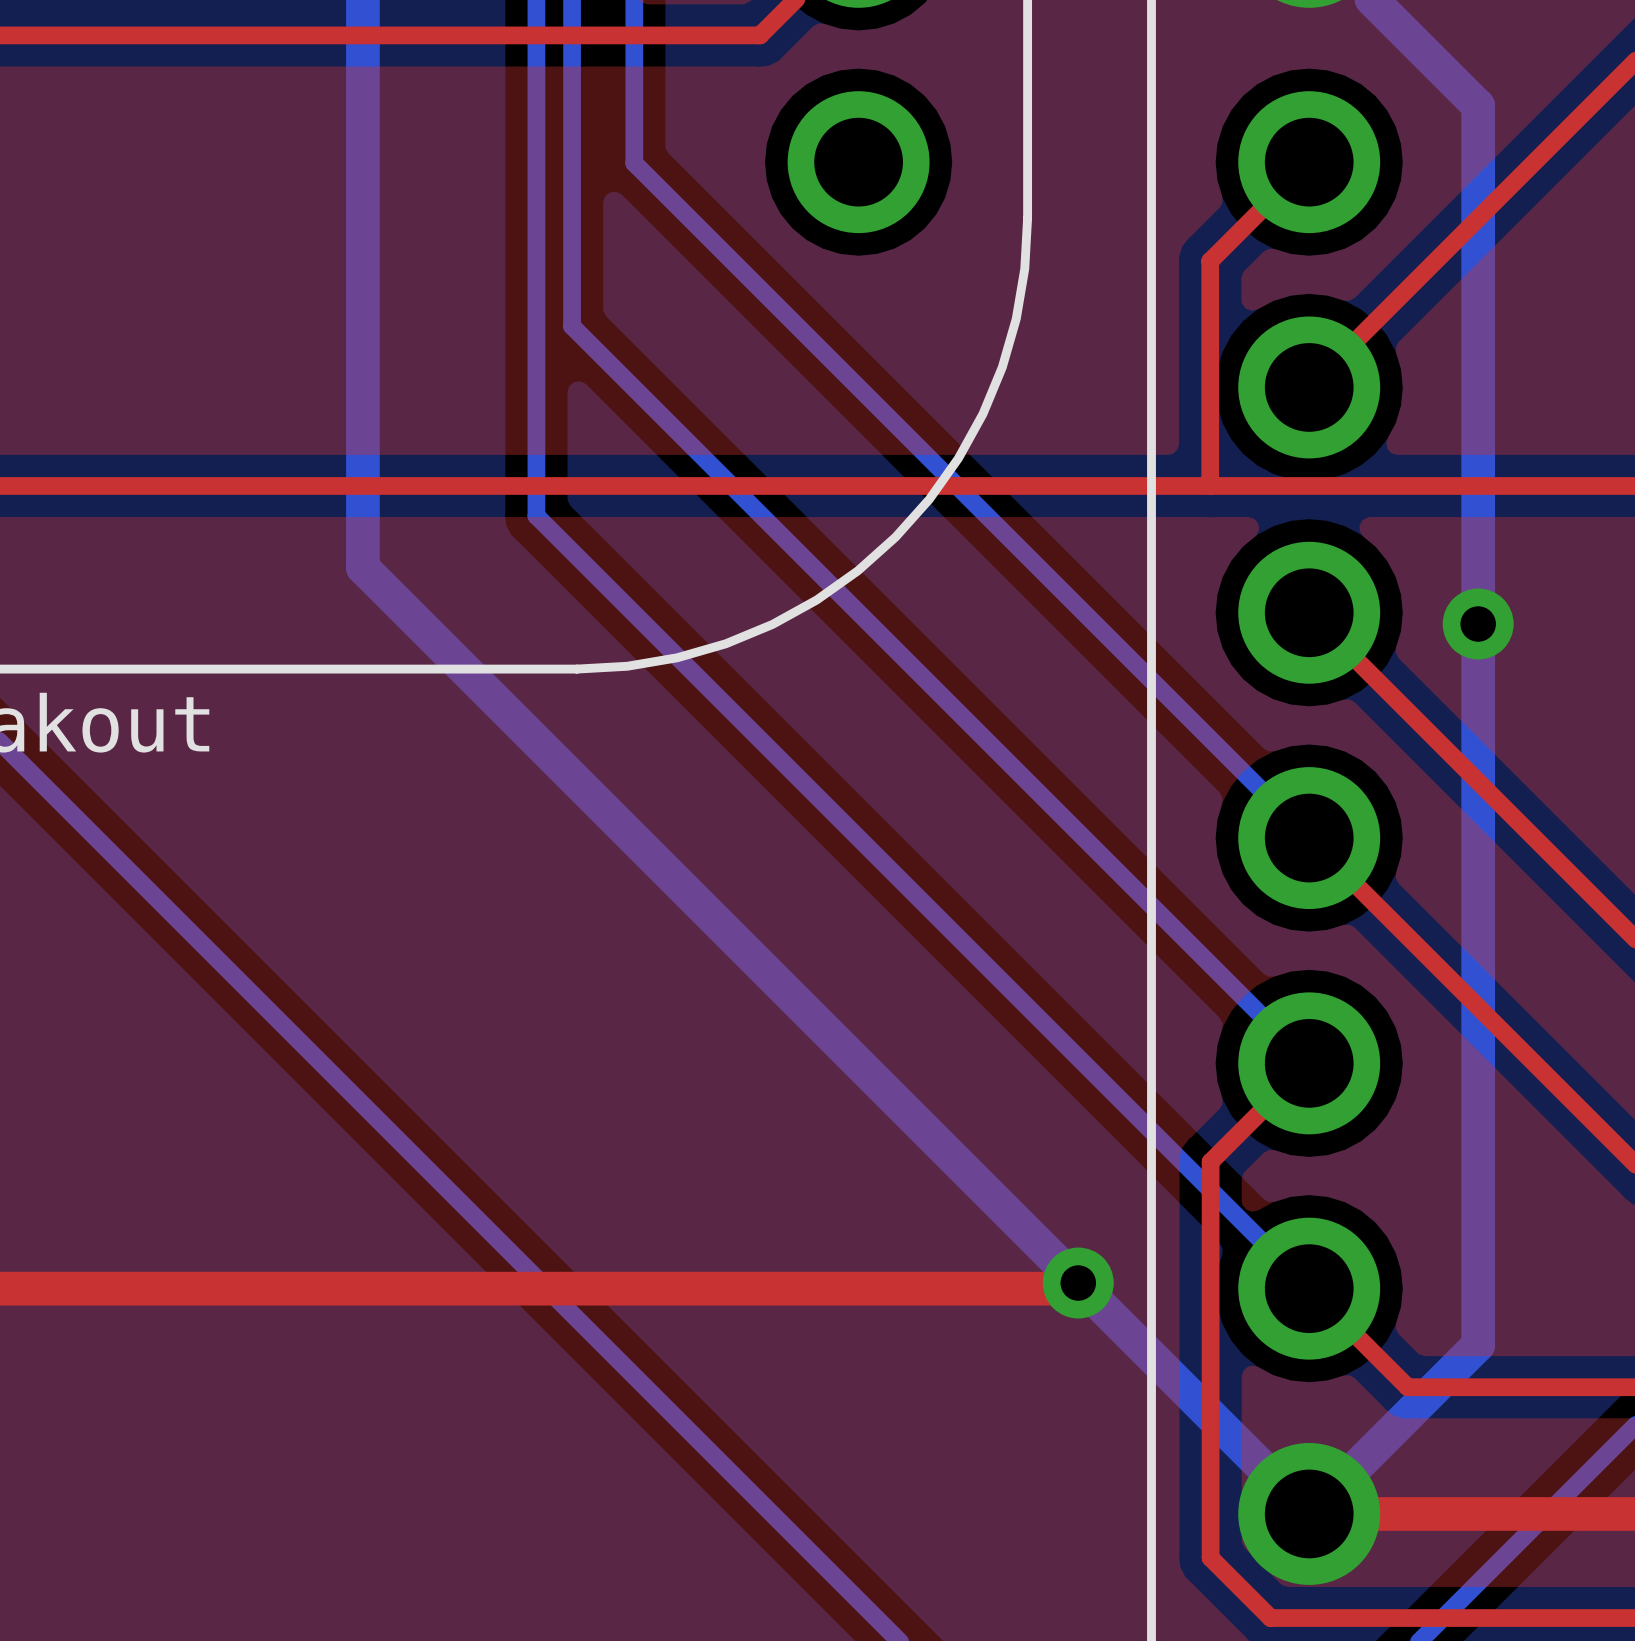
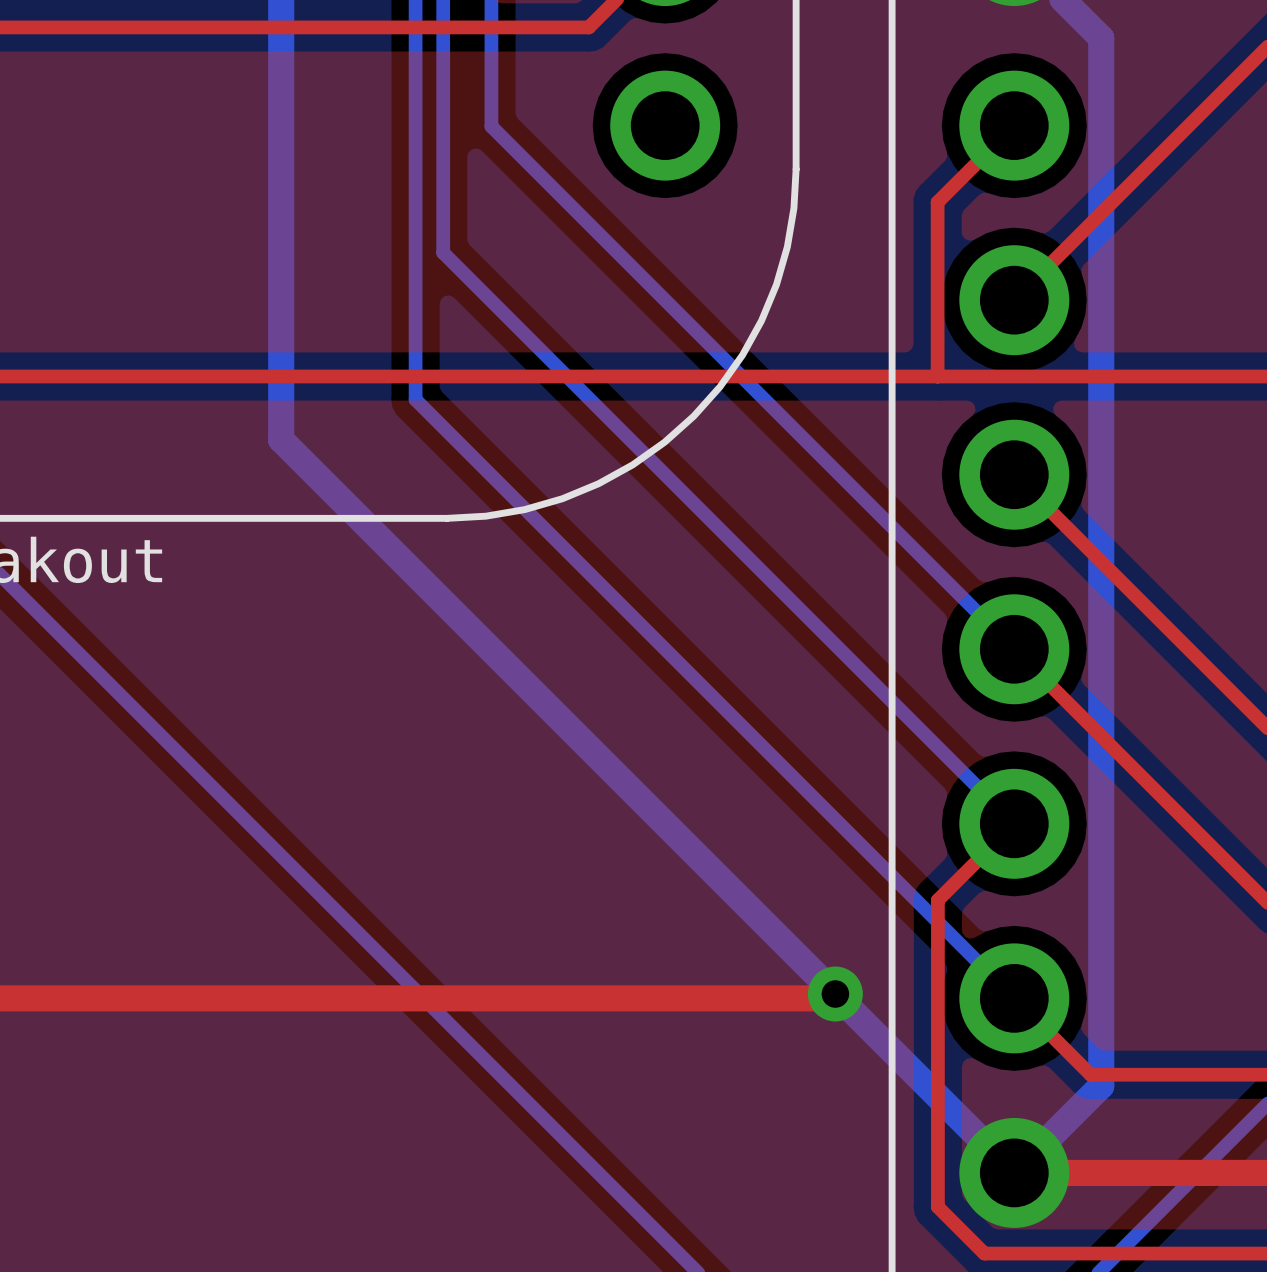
bottom track: (1421, 49) (1478, 105) (1478, 1344) (1421, 1401) -> (1101, 38) (1101, 1085)
via: (1478, 624) -> none

